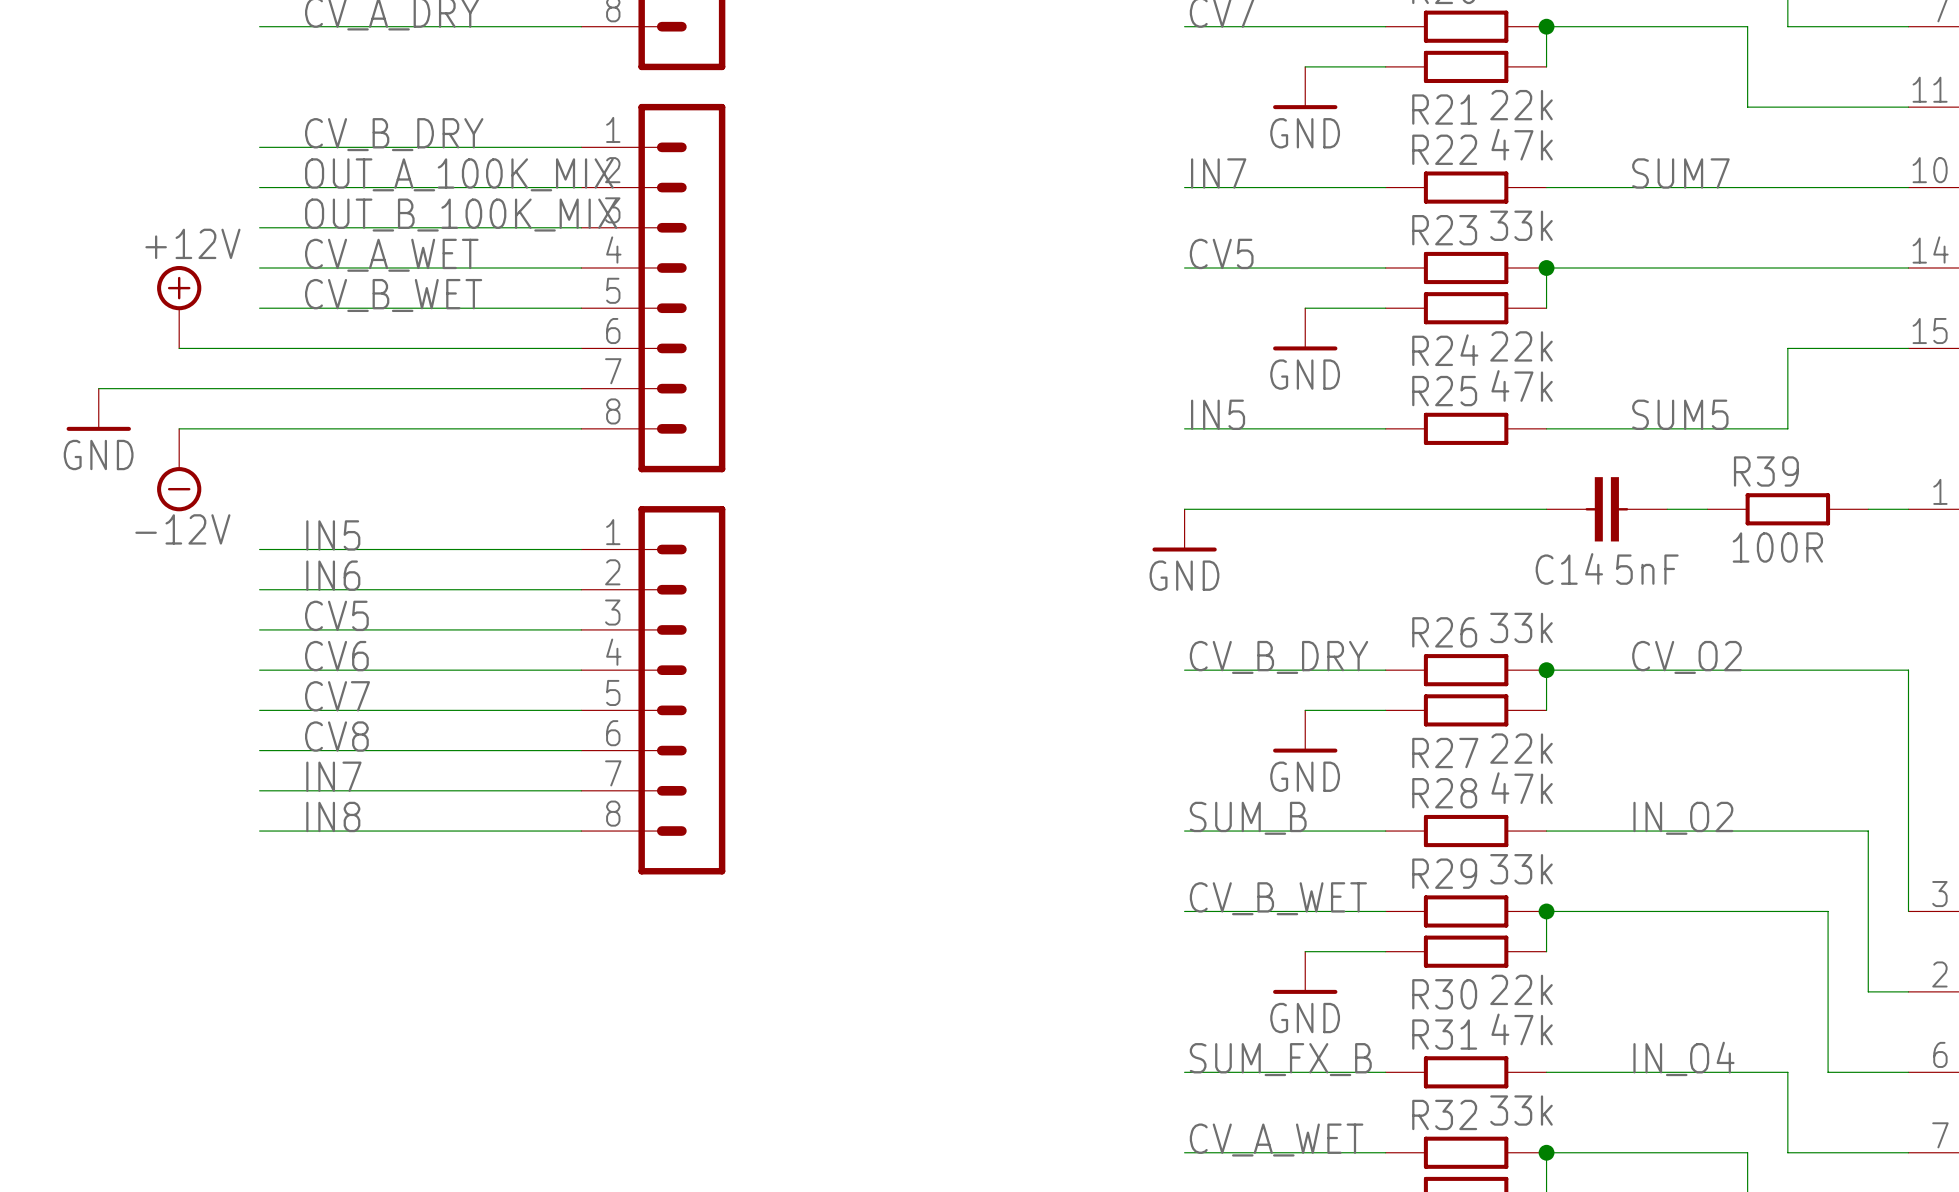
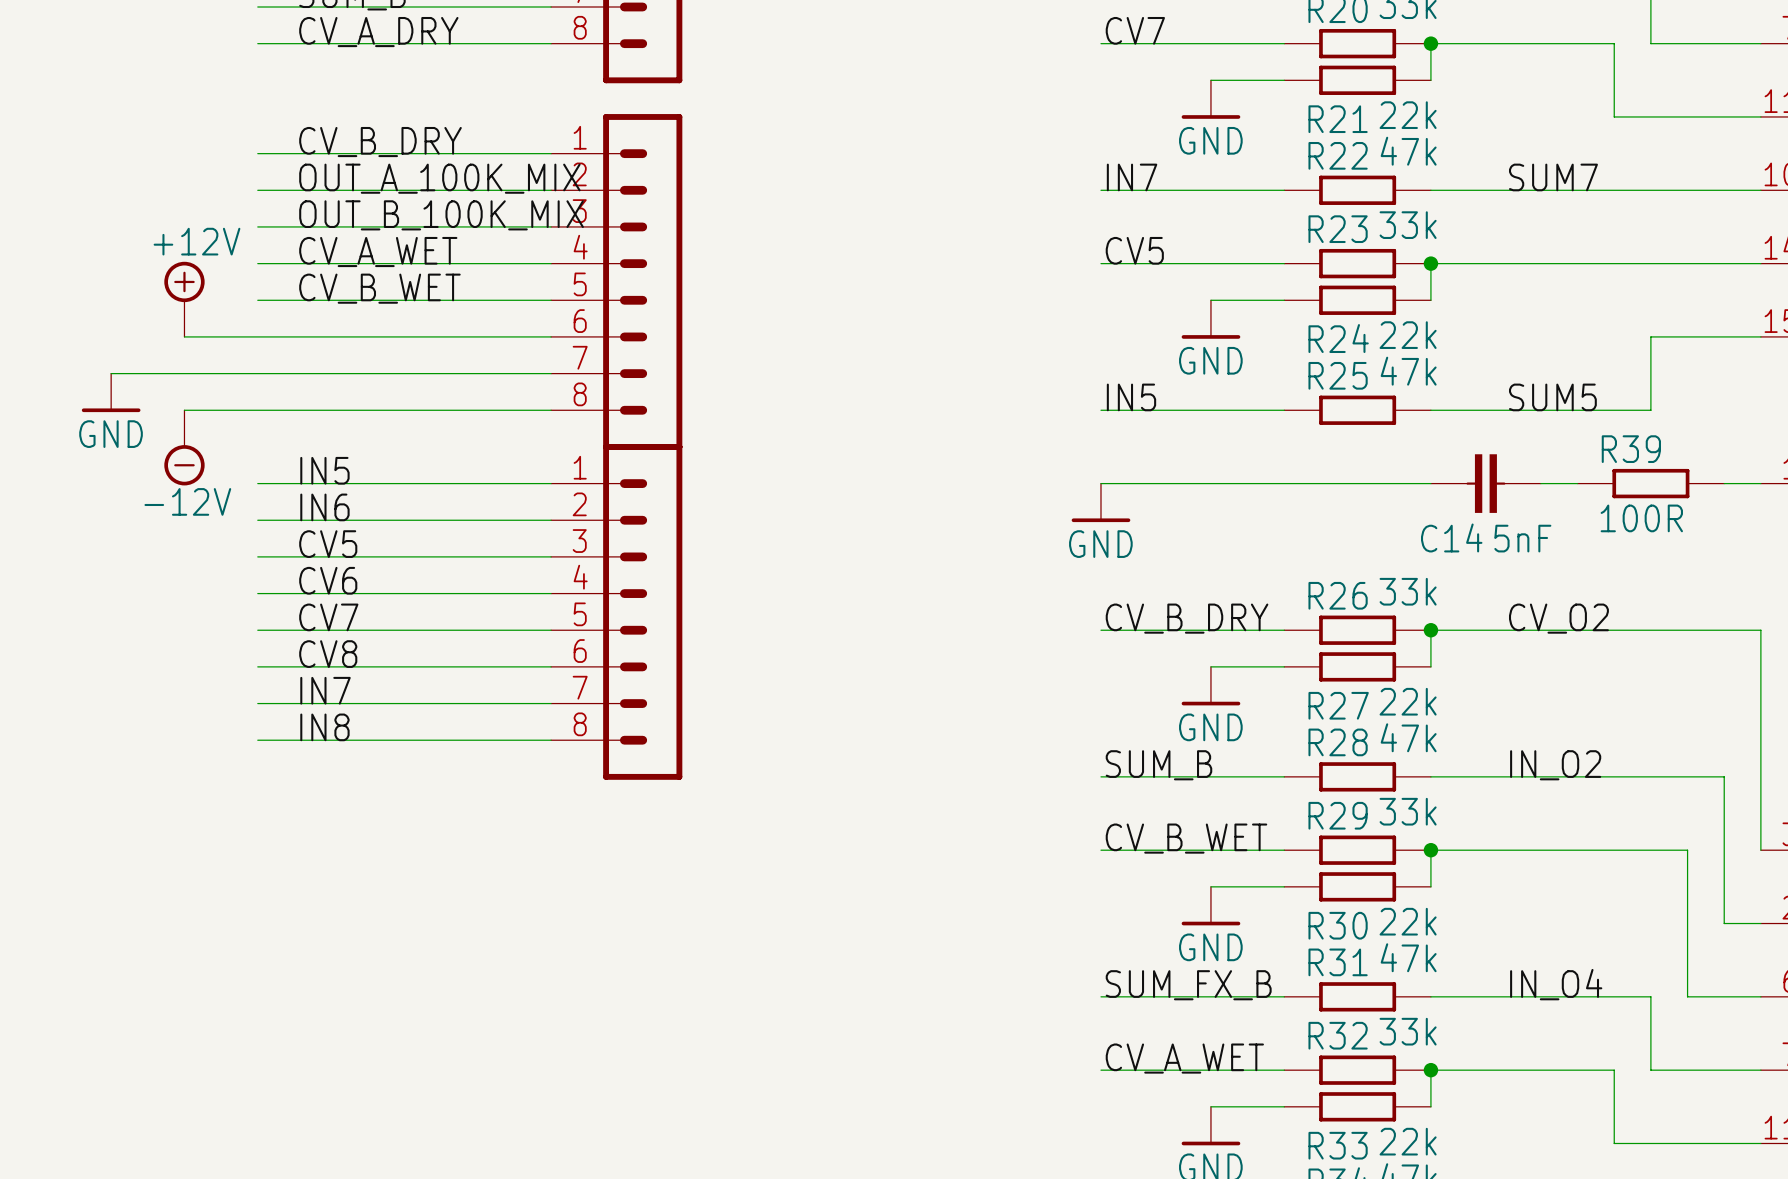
label: none -> IN5 (324, 470)
label: IN5 (333, 535) -> IN6 (324, 507)
label: IN6 (333, 575) -> CV5 (328, 544)
label: CV5 (336, 615) -> CV6 (328, 580)
label: CV6 (336, 656) -> CV7 (328, 617)
part position: (653, 690) -> (616, 611)
label: CV7 (337, 696) -> CV8 (328, 654)
label: CV8 (336, 736) -> IN7 (325, 690)
label: IN7 (333, 776) -> IN8 (324, 727)
label: IN8 (333, 816) -> none
wire: (259, 831) (581, 831) -> (257, 483) (551, 483)

